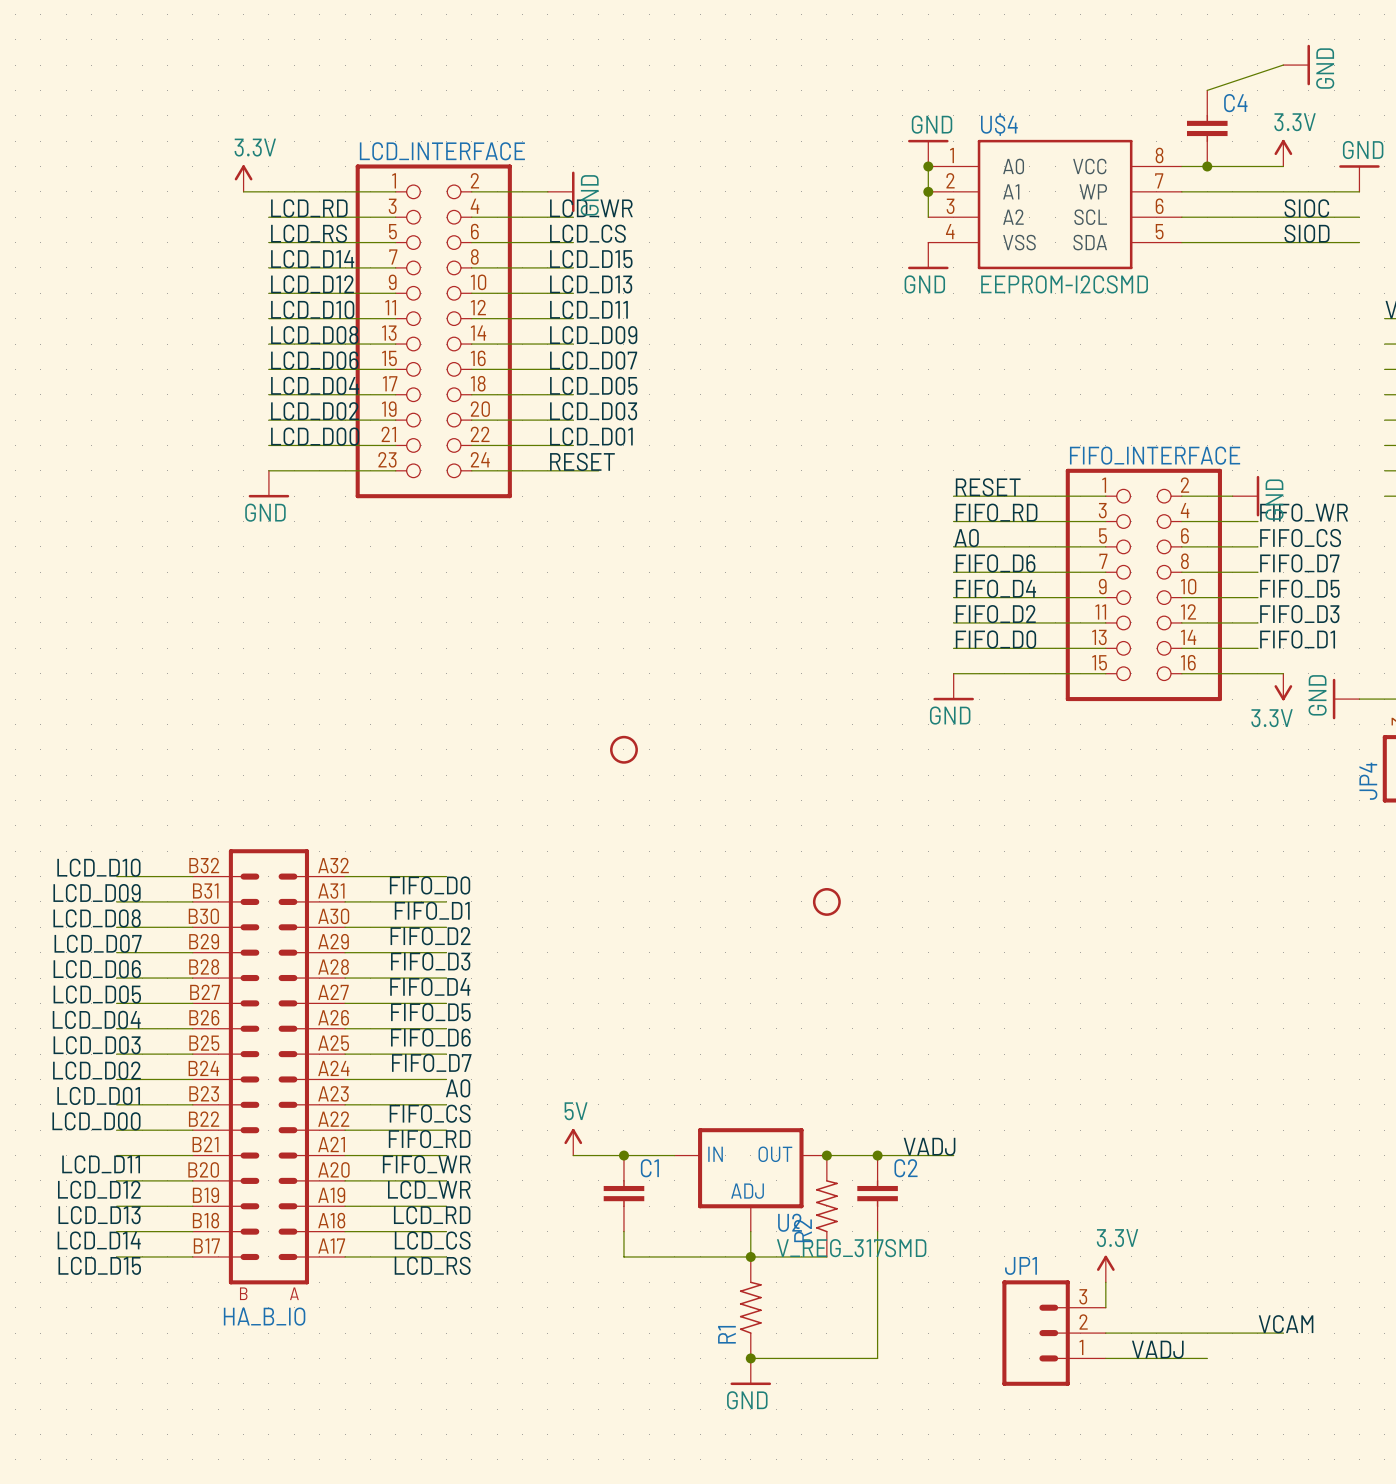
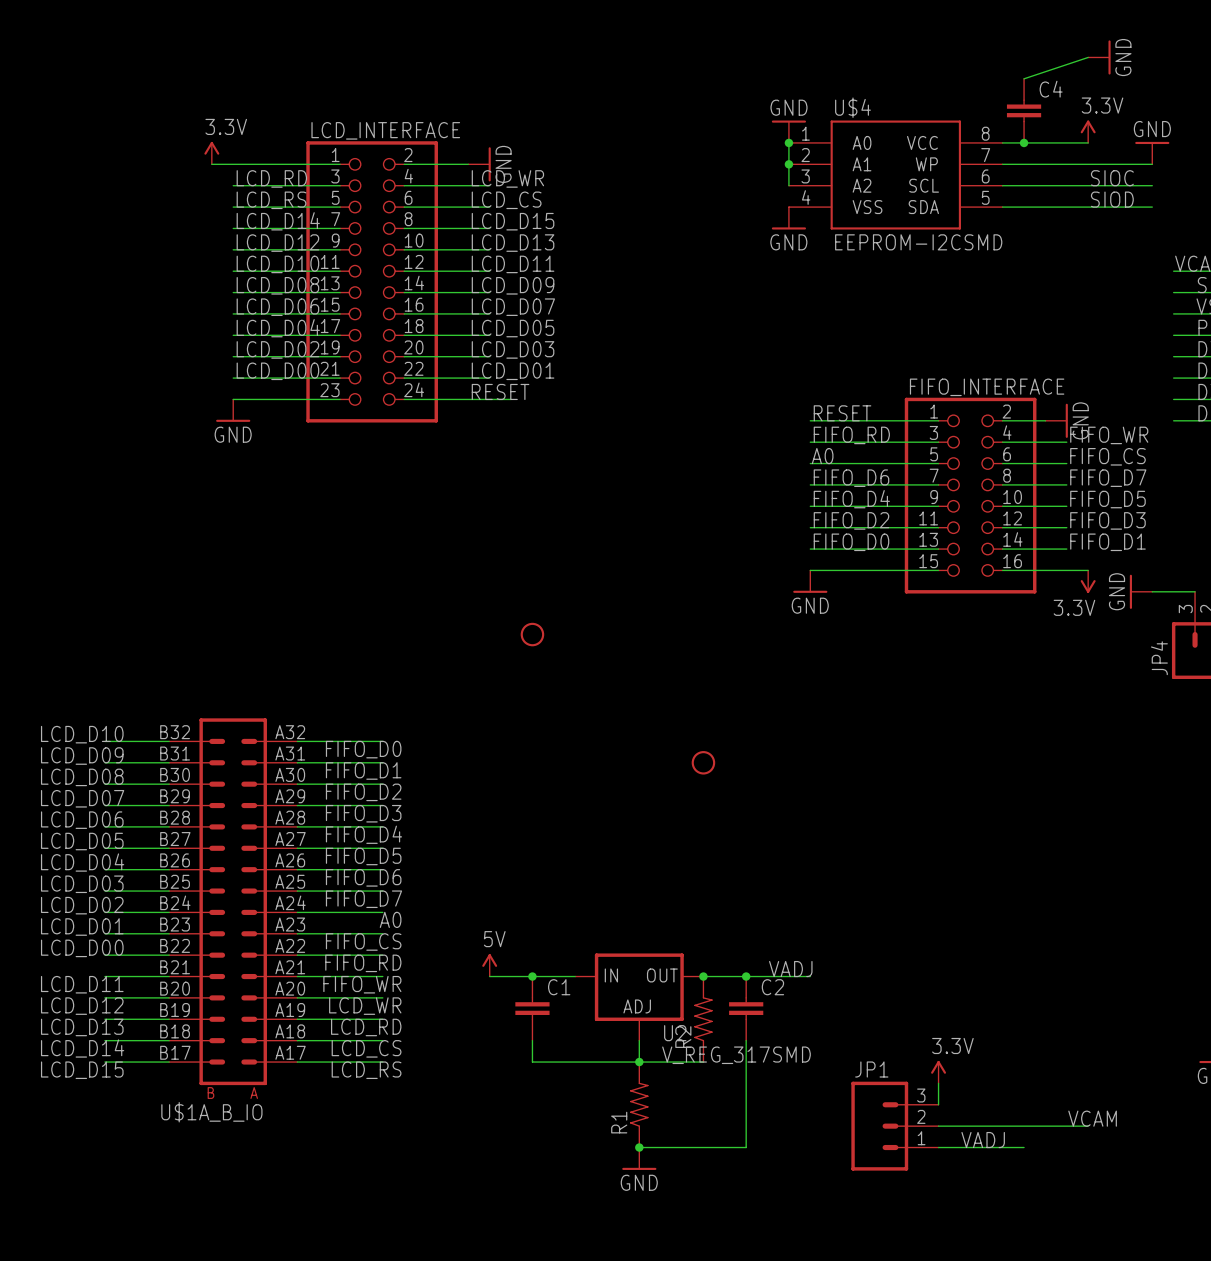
HA_B_IO name: HA_B_IO (264, 1316) -> U$1A_B_IO (211, 1112)

